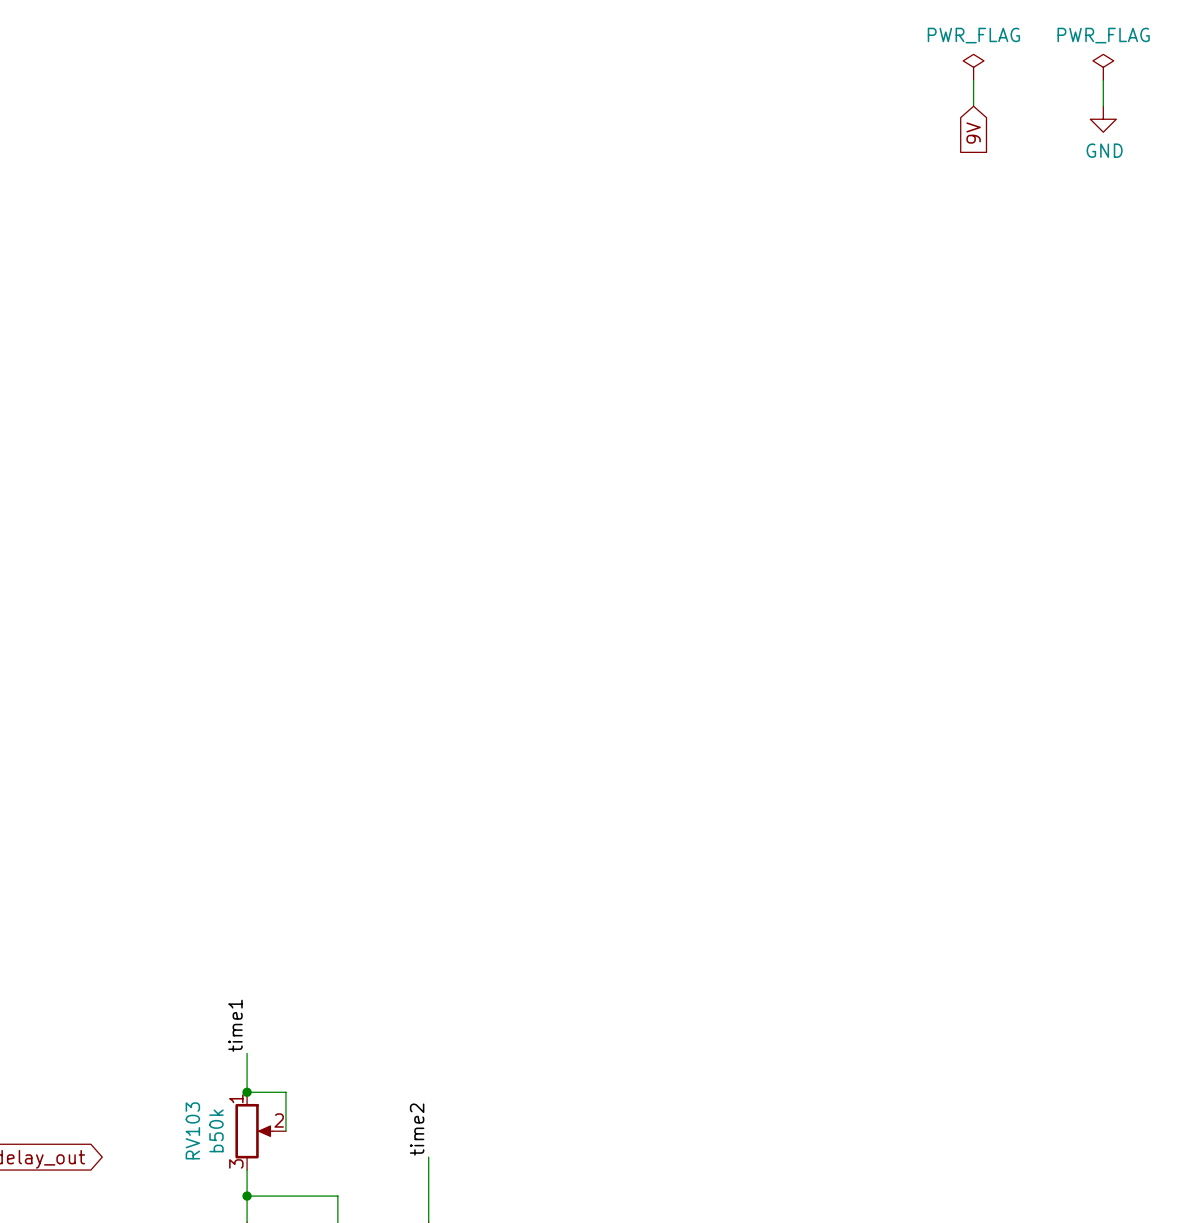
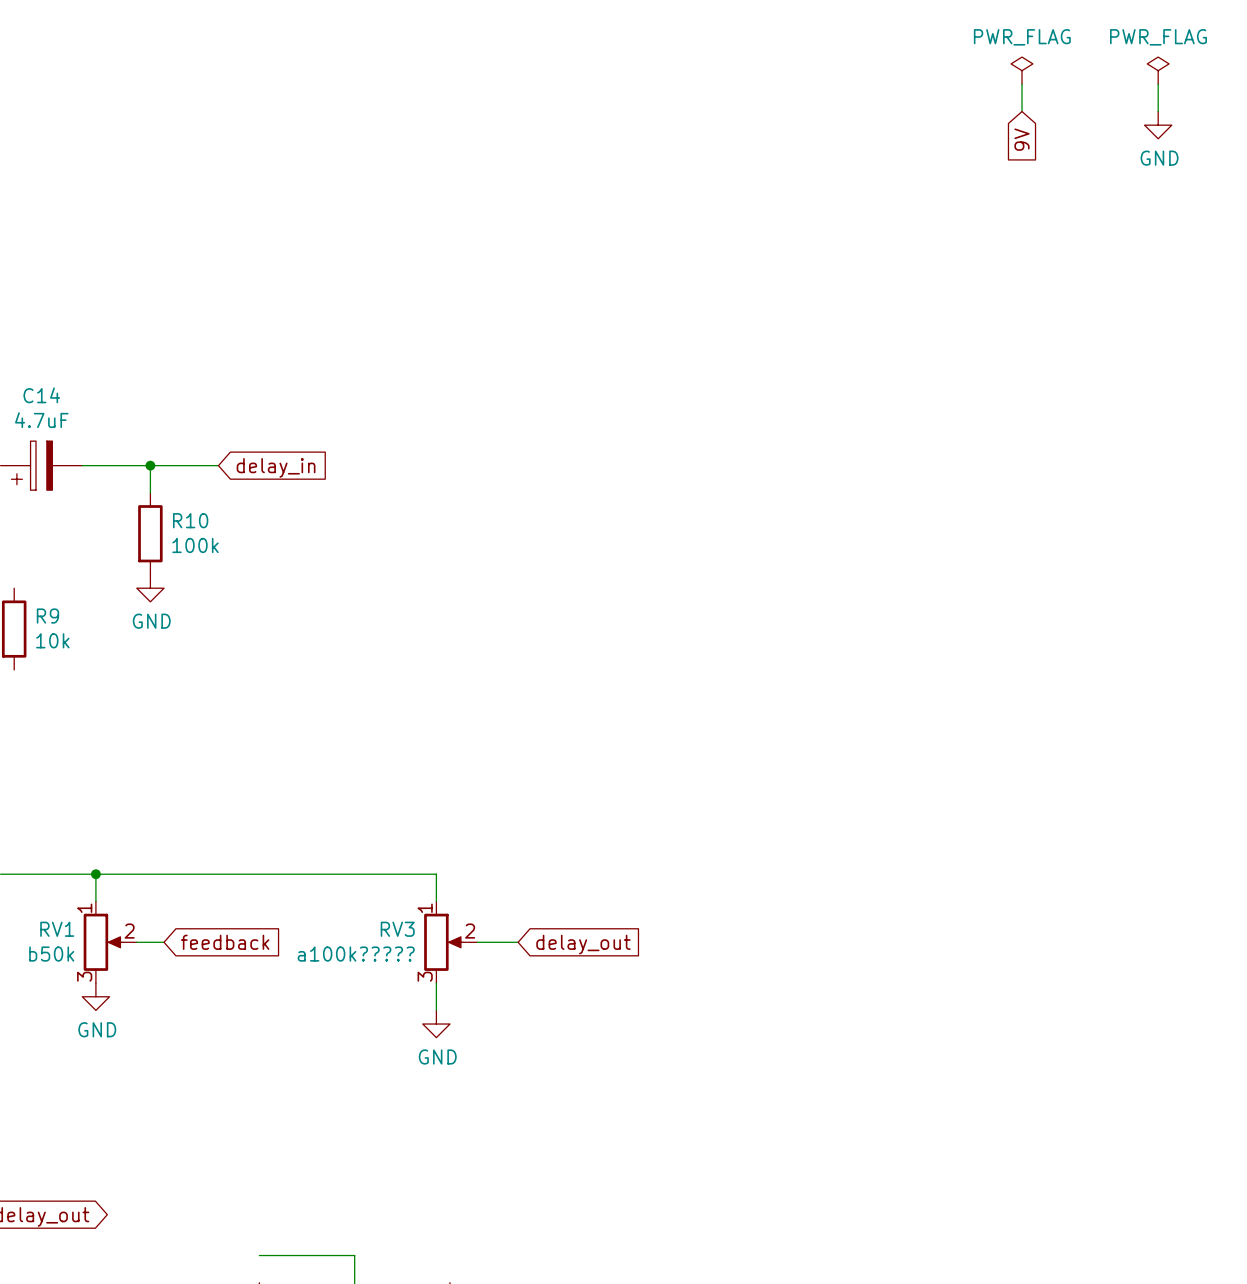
C14: none -> 4.7uF (41, 465)
wire: none -> (82, 465) (218, 465)
wire: none -> (150, 465) (150, 492)
junction: none -> (150, 465)
global label: none -> delay_in (276, 467)
R10: none -> 100k (150, 533)
power symbol: none -> GND (150, 588)
R9: none -> 10k (14, 629)
wire: none -> (0, 874) (436, 874) (436, 901)
wire: none -> (95, 874) (95, 901)
junction: none -> (95, 874)
RV1: none -> b50k (110, 942)
wire: none -> (136, 942) (164, 942)
global label: none -> feedback (225, 942)
RV3: none -> a100k????? (450, 942)
wire: none -> (477, 942) (518, 942)
global label: none -> delay_out (583, 944)
wire: none -> (436, 983) (436, 1010)
power symbol: none -> GND (95, 996)
power symbol: none -> GND (436, 1024)
label: time1 (235, 1025) -> none
wire: (247, 1053) (247, 1092) (285, 1092) (285, 1131) -> none
junction: (247, 1092) -> none
label: time2 (417, 1129) -> none
RV103: b50k (260, 1131) -> none
wire: (428, 1157) (428, 1222) -> none
wire: (247, 1170) (247, 1222) -> none
junction: (247, 1196) -> none

